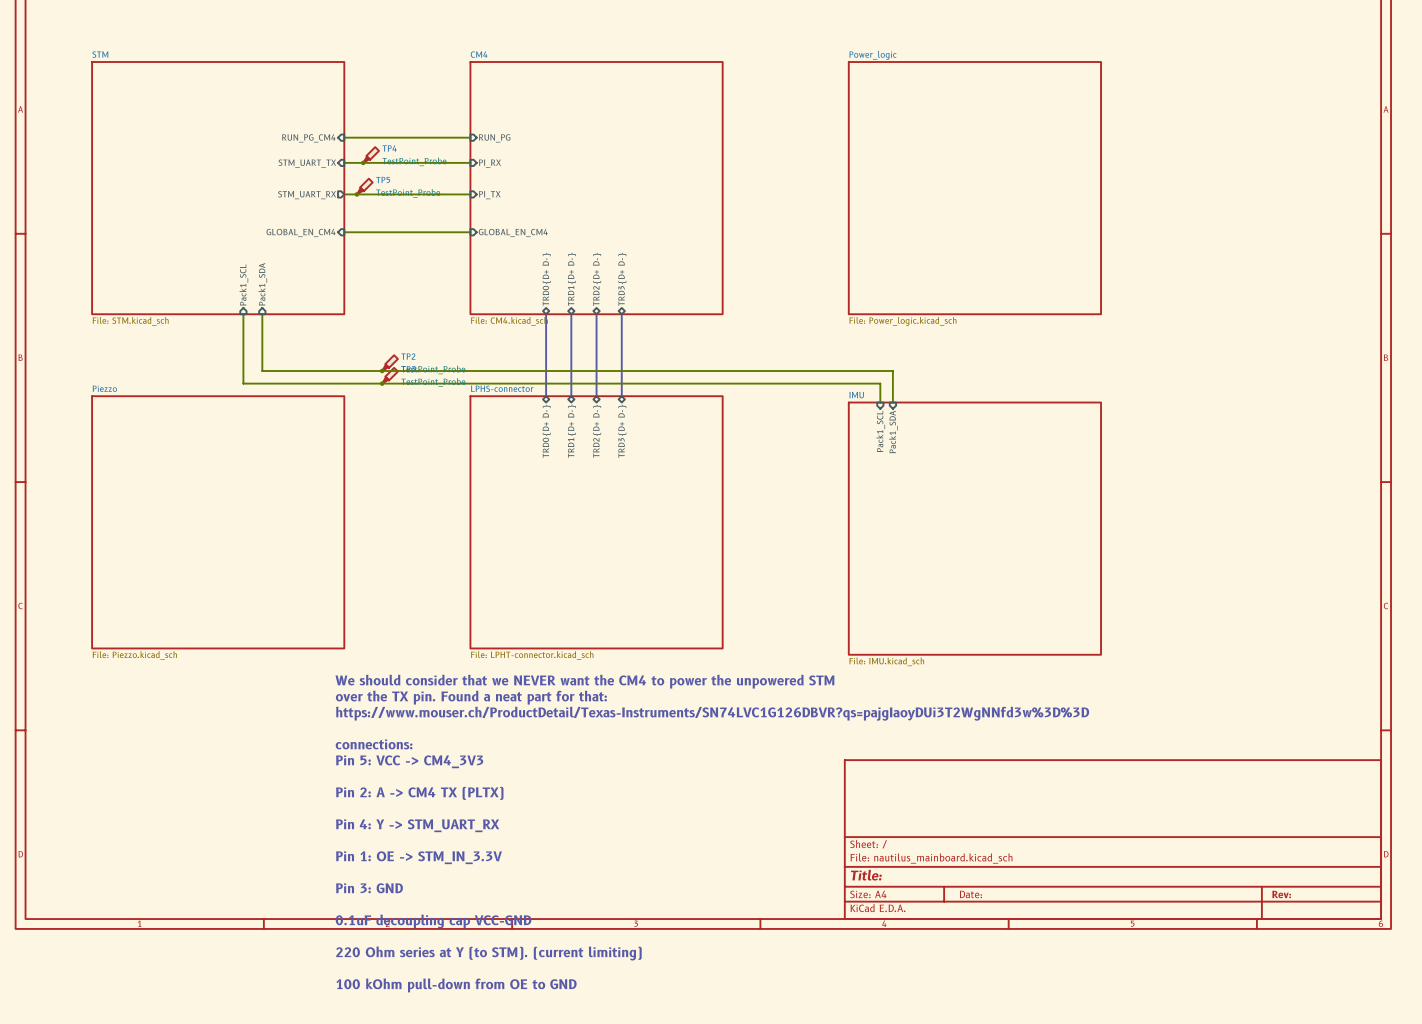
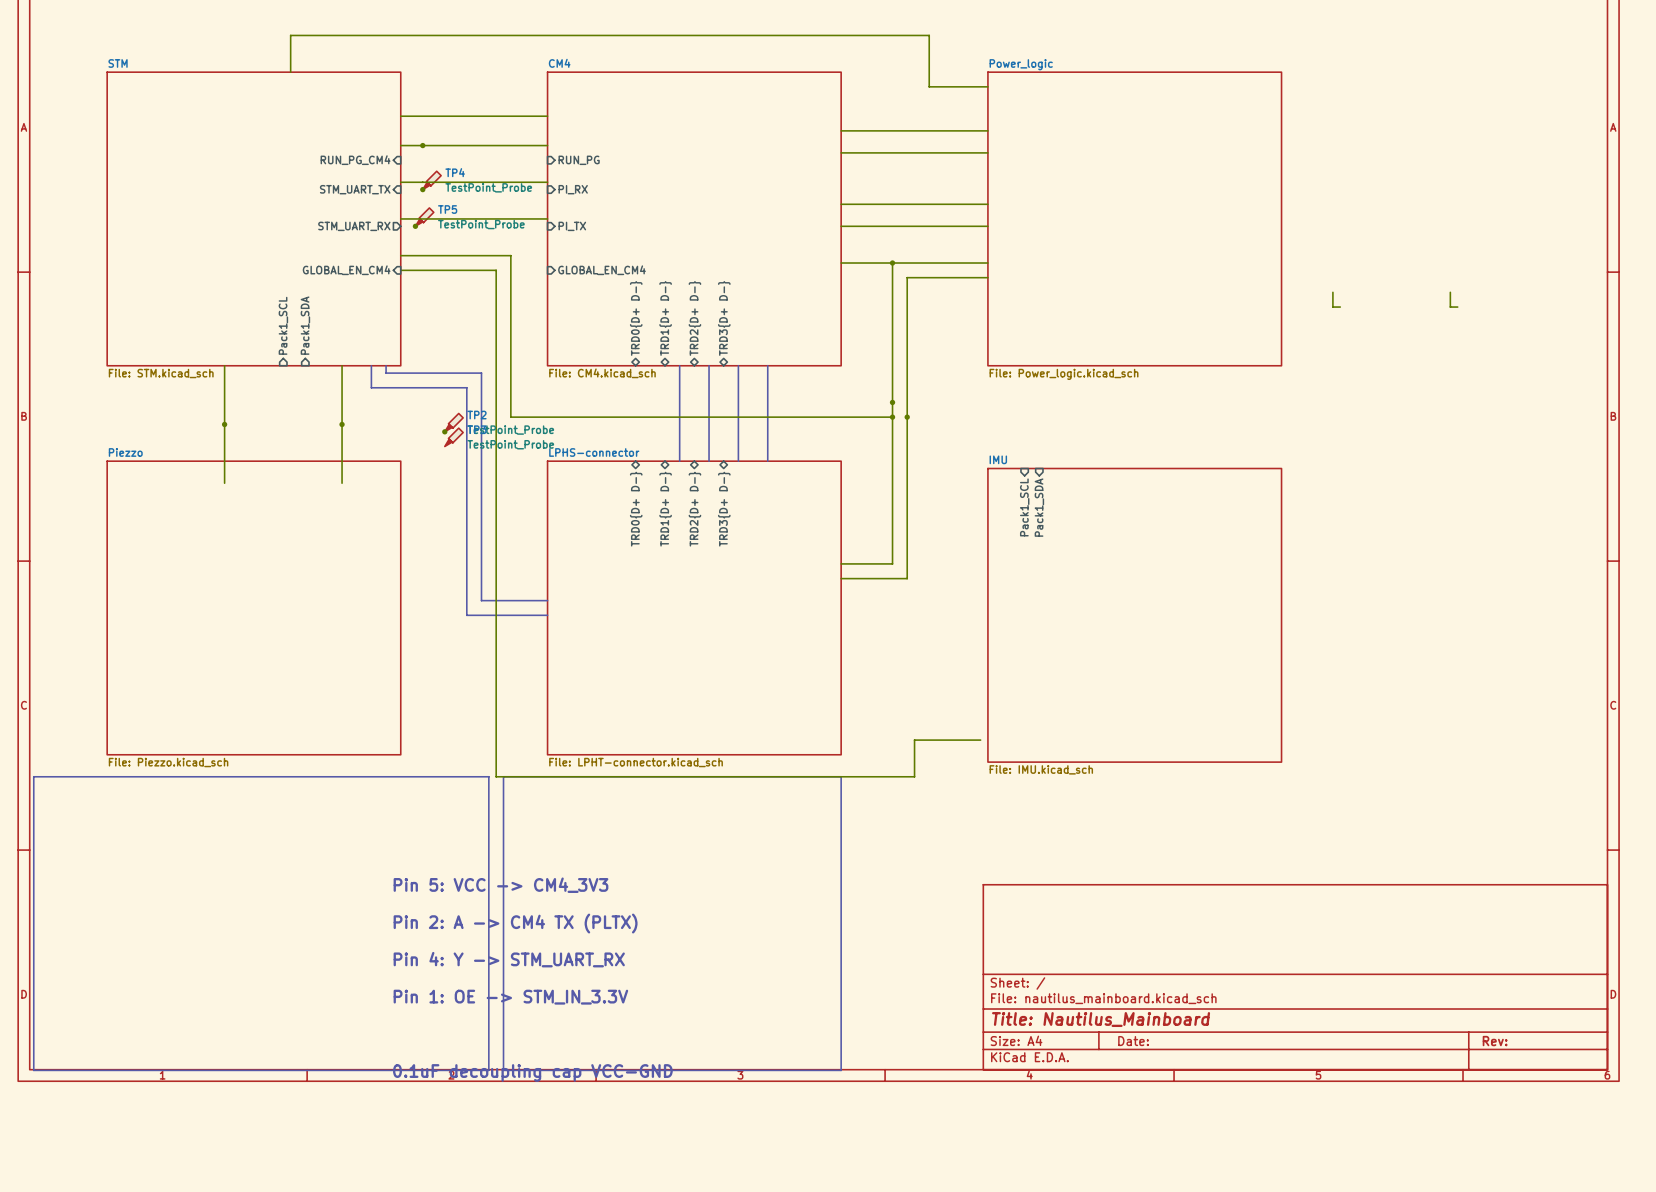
wire: none -> (290, 72) (290, 35) (929, 35) (929, 86) (987, 86)
wire: none -> (841, 130) (987, 130)
junction: none -> (422, 145)
wire: none -> (841, 152) (987, 152)
wire: (344, 137) (470, 137) -> (400, 116) (547, 116)
wire: (344, 162) (470, 162) -> (400, 145) (547, 145)
wire: none -> (841, 204) (987, 204)
wire: none -> (400, 218) (547, 218)
wire: (344, 194) (470, 194) -> (400, 182) (547, 182)
wire: none -> (841, 226) (987, 226)
wire: none -> (400, 255) (510, 255) (510, 417) (892, 417)
wire: none -> (841, 263) (987, 263)
wire: none -> (892, 263) (892, 563) (841, 563)
junction: none -> (892, 263)
wire: (426, 232) (470, 232) -> (496, 270) (496, 776) (914, 776) (914, 740) (980, 740)
wire: none -> (987, 277) (907, 277) (907, 578) (841, 578)
wire: none -> (1332, 292) (1332, 307) (1340, 307)
wire: none -> (1450, 292) (1450, 307) (1457, 307)
wire: none -> (224, 365) (224, 483)
wire: (243, 314) (243, 383) (880, 383) (880, 402) -> none
wire: (262, 314) (262, 370) (892, 370) (892, 402) -> none
wire: none -> (342, 365) (342, 483)
bus: none -> (371, 365) (371, 387) (466, 387) (466, 615) (547, 615)
bus: none -> (386, 365) (386, 373) (481, 373) (481, 600) (547, 600)
bus: (546, 314) (546, 396) -> (679, 365) (679, 461)
bus: (571, 314) (571, 396) -> (709, 365) (709, 461)
bus: (596, 314) (596, 396) -> (738, 365) (738, 461)
bus: (621, 314) (621, 396) -> (767, 365) (767, 461)
junction: none -> (892, 402)
junction: none -> (892, 417)
junction: none -> (907, 417)
junction: none -> (224, 424)
junction: none -> (342, 424)
junction: (382, 383) -> none
line: none -> (33, 776) (488, 776) (488, 1070) (33, 1070) (33, 776)
line: none -> (503, 776) (841, 776) (841, 1070) (503, 1070) (503, 776)
text: We should consider that we NEVER want the CM4 to power the unpowered STM (584, 681) -> none
text: over the TX pin. Found a neat part for that: (471, 697) -> none
text: https://www.mouser.ch/ProductDetail/Texas-Instruments/SN74LVC1G126DBVR?qs=pajgIaoyDUi3T2WgNNfd3w%3D%3D (712, 713) -> none
text: connections: (374, 744) -> none
title block: Title: (866, 875) -> Title: Nautilus_Mainboard (1101, 1019)
text: Pin 3: GND (369, 888) -> none
text: 220 Ohm series at Y (to STM). (current limiting) (488, 953) -> none
text: 100 kOhm pull-down from OE to GND (456, 985) -> none

